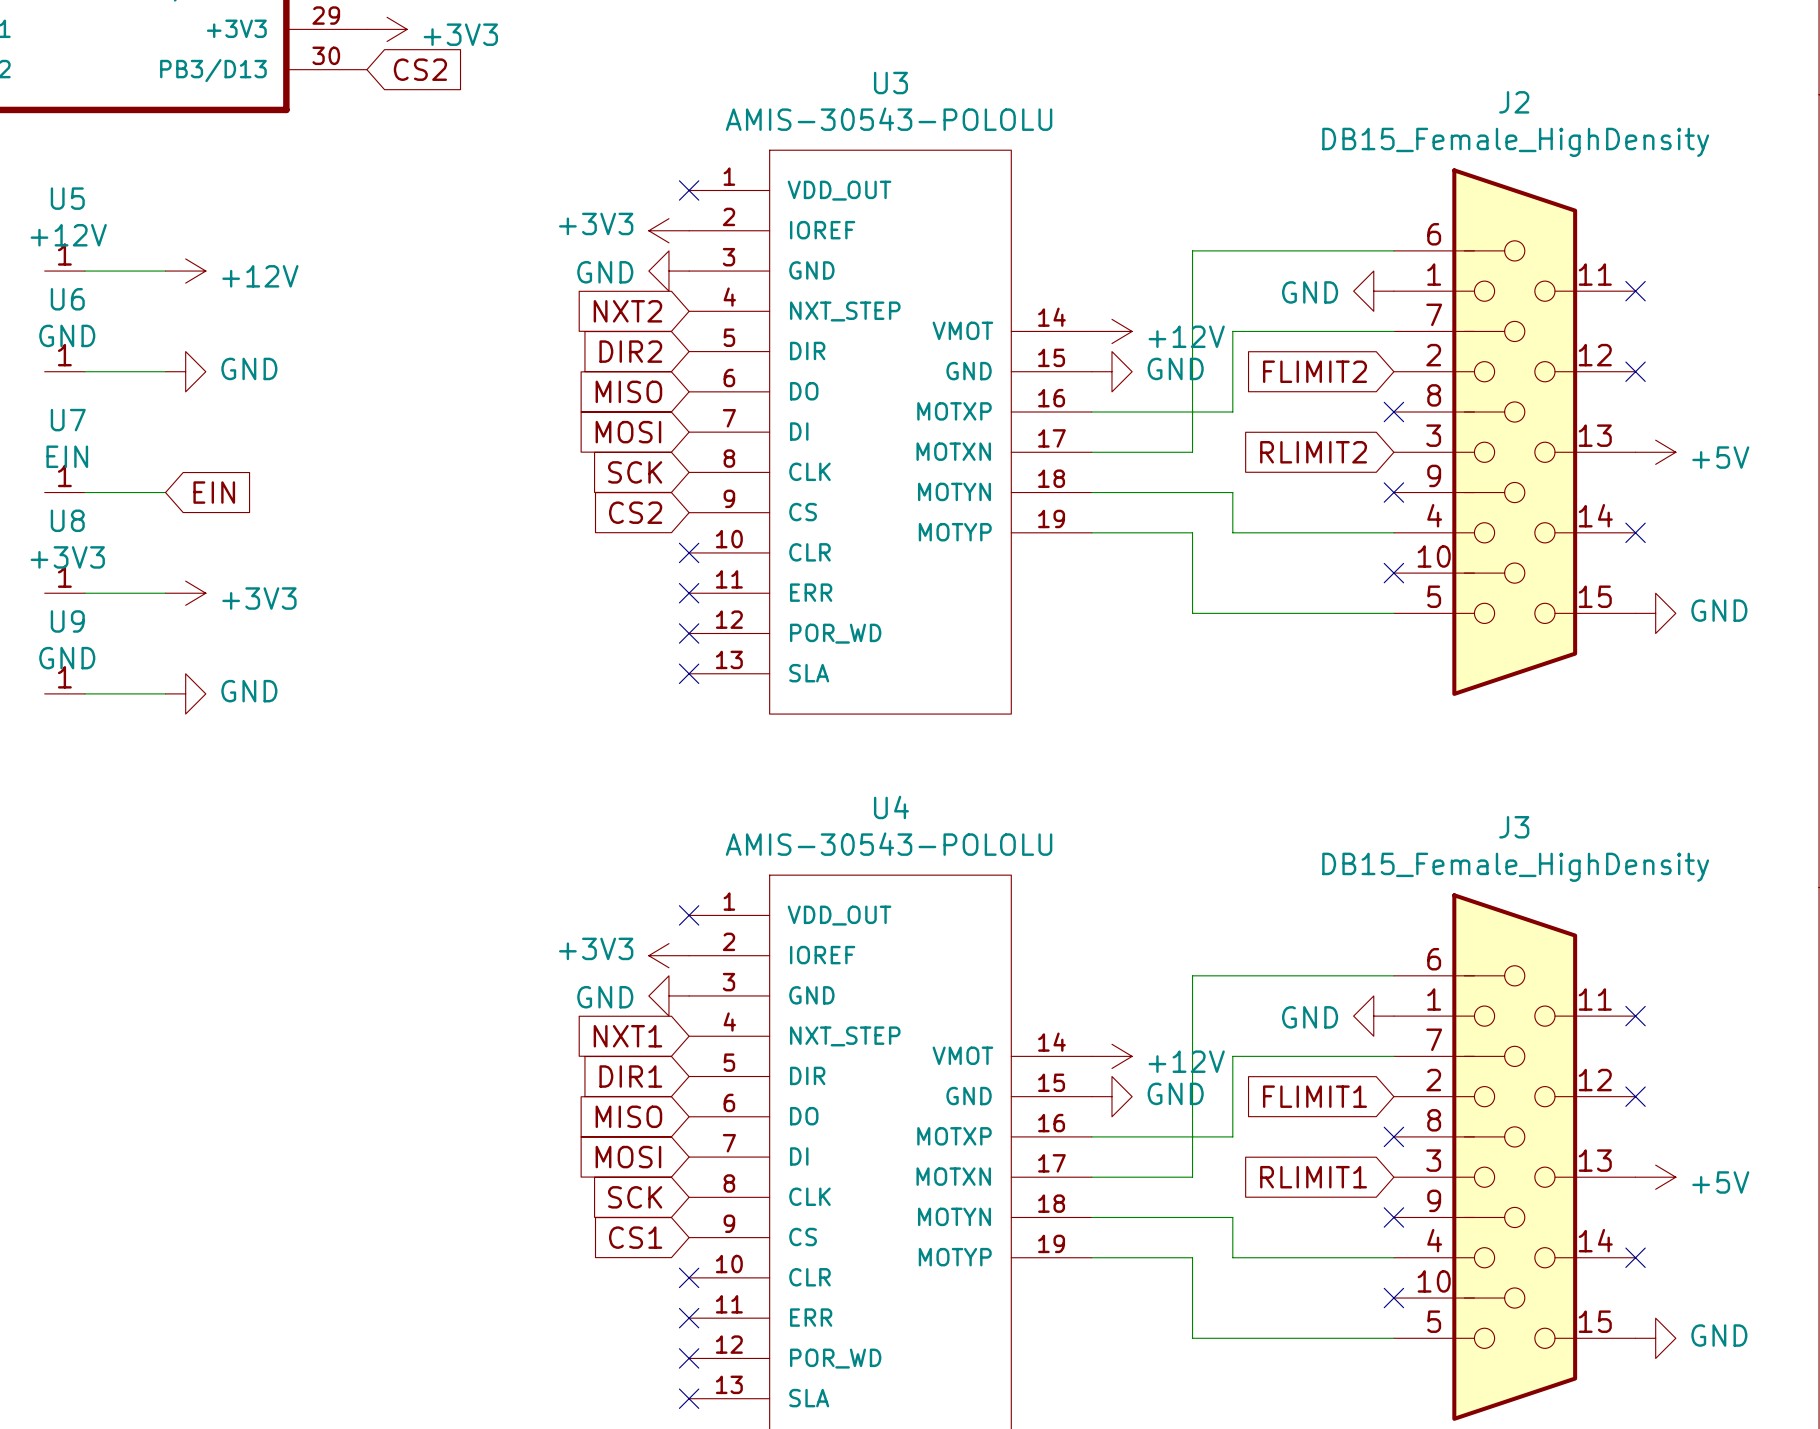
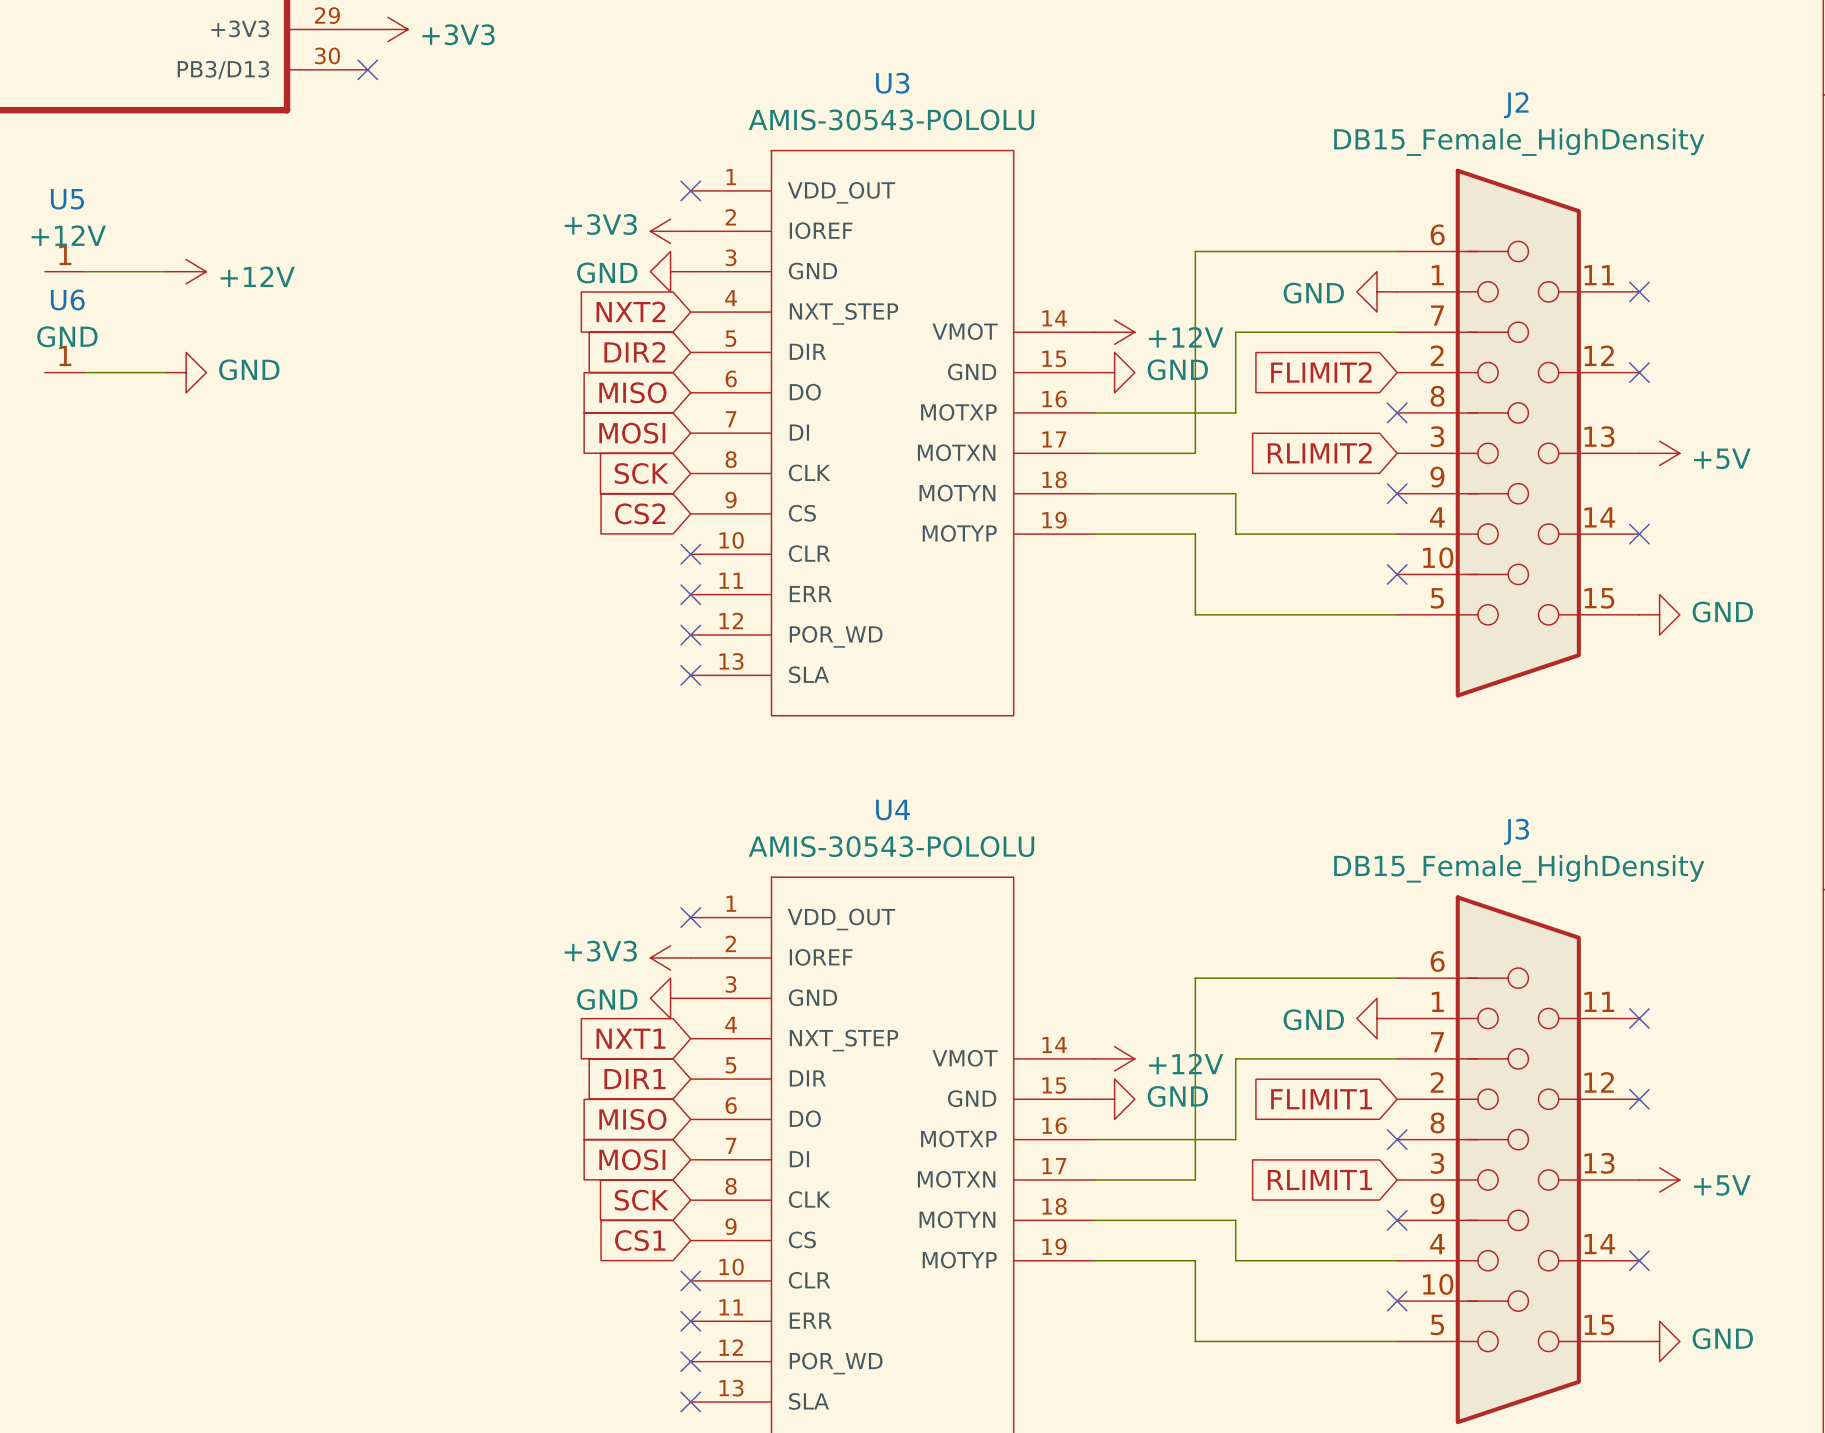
no-connect mark: none -> (367, 69)
global label: CS2 (420, 69) -> none
U7: EIN (64, 492) -> none
wire: (85, 492) (165, 492) -> none
global label: EIN (214, 492) -> none
U8: +3V3 (64, 593) -> none
wire: (85, 593) (165, 593) -> none
power symbol: +3V3 (185, 593) -> none
U9: GND (64, 693) -> none
wire: (85, 693) (165, 693) -> none
power symbol: GND (185, 693) -> none

